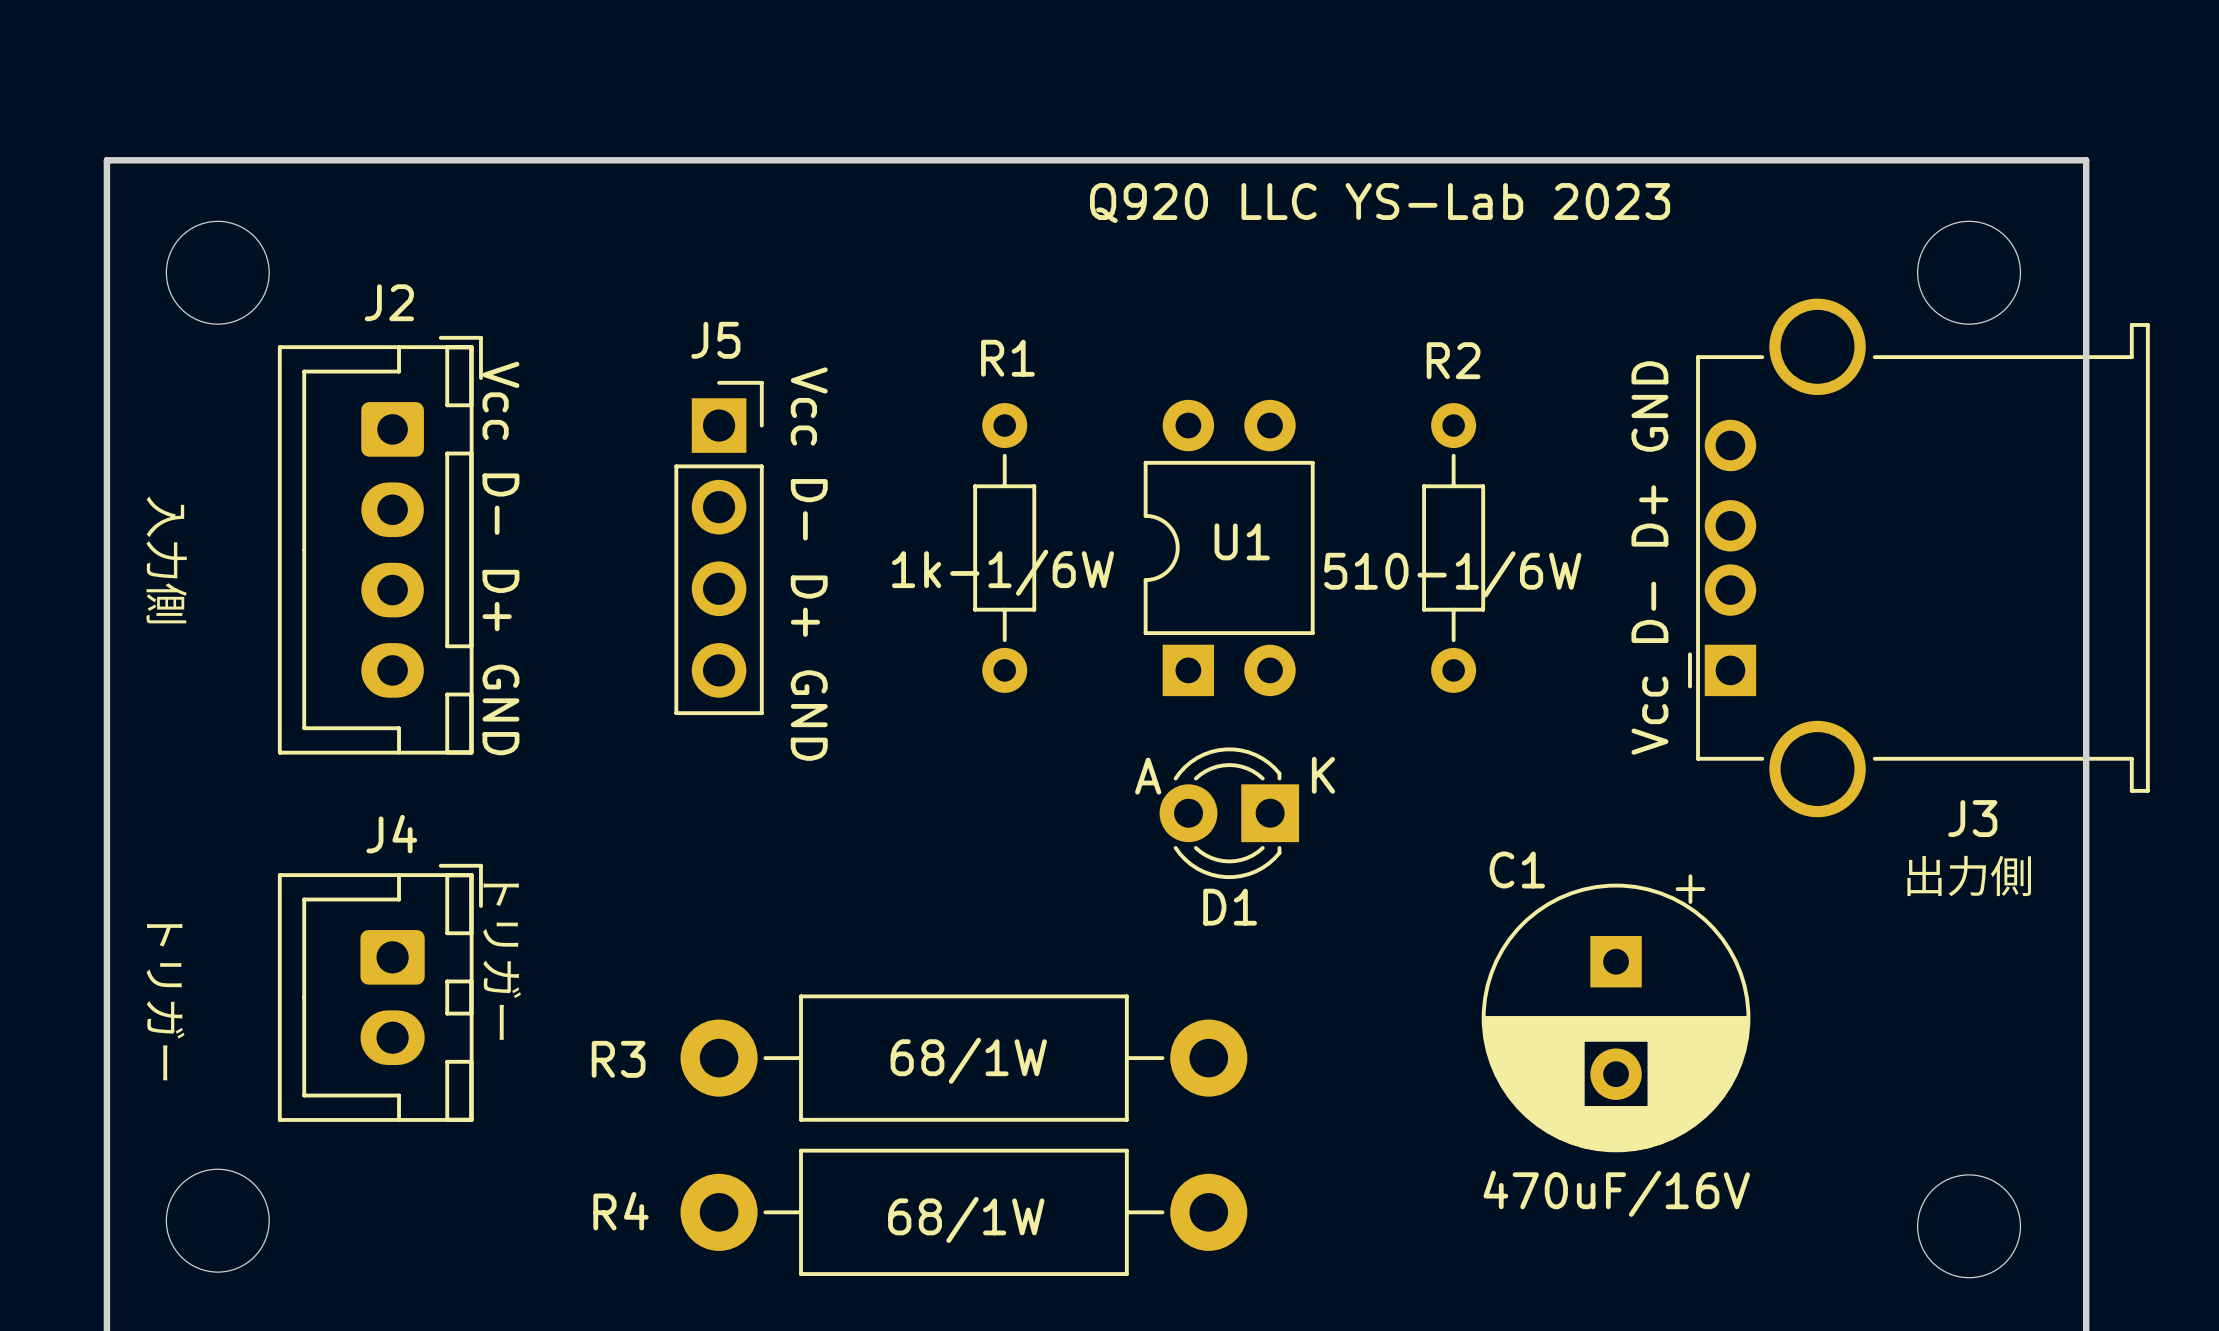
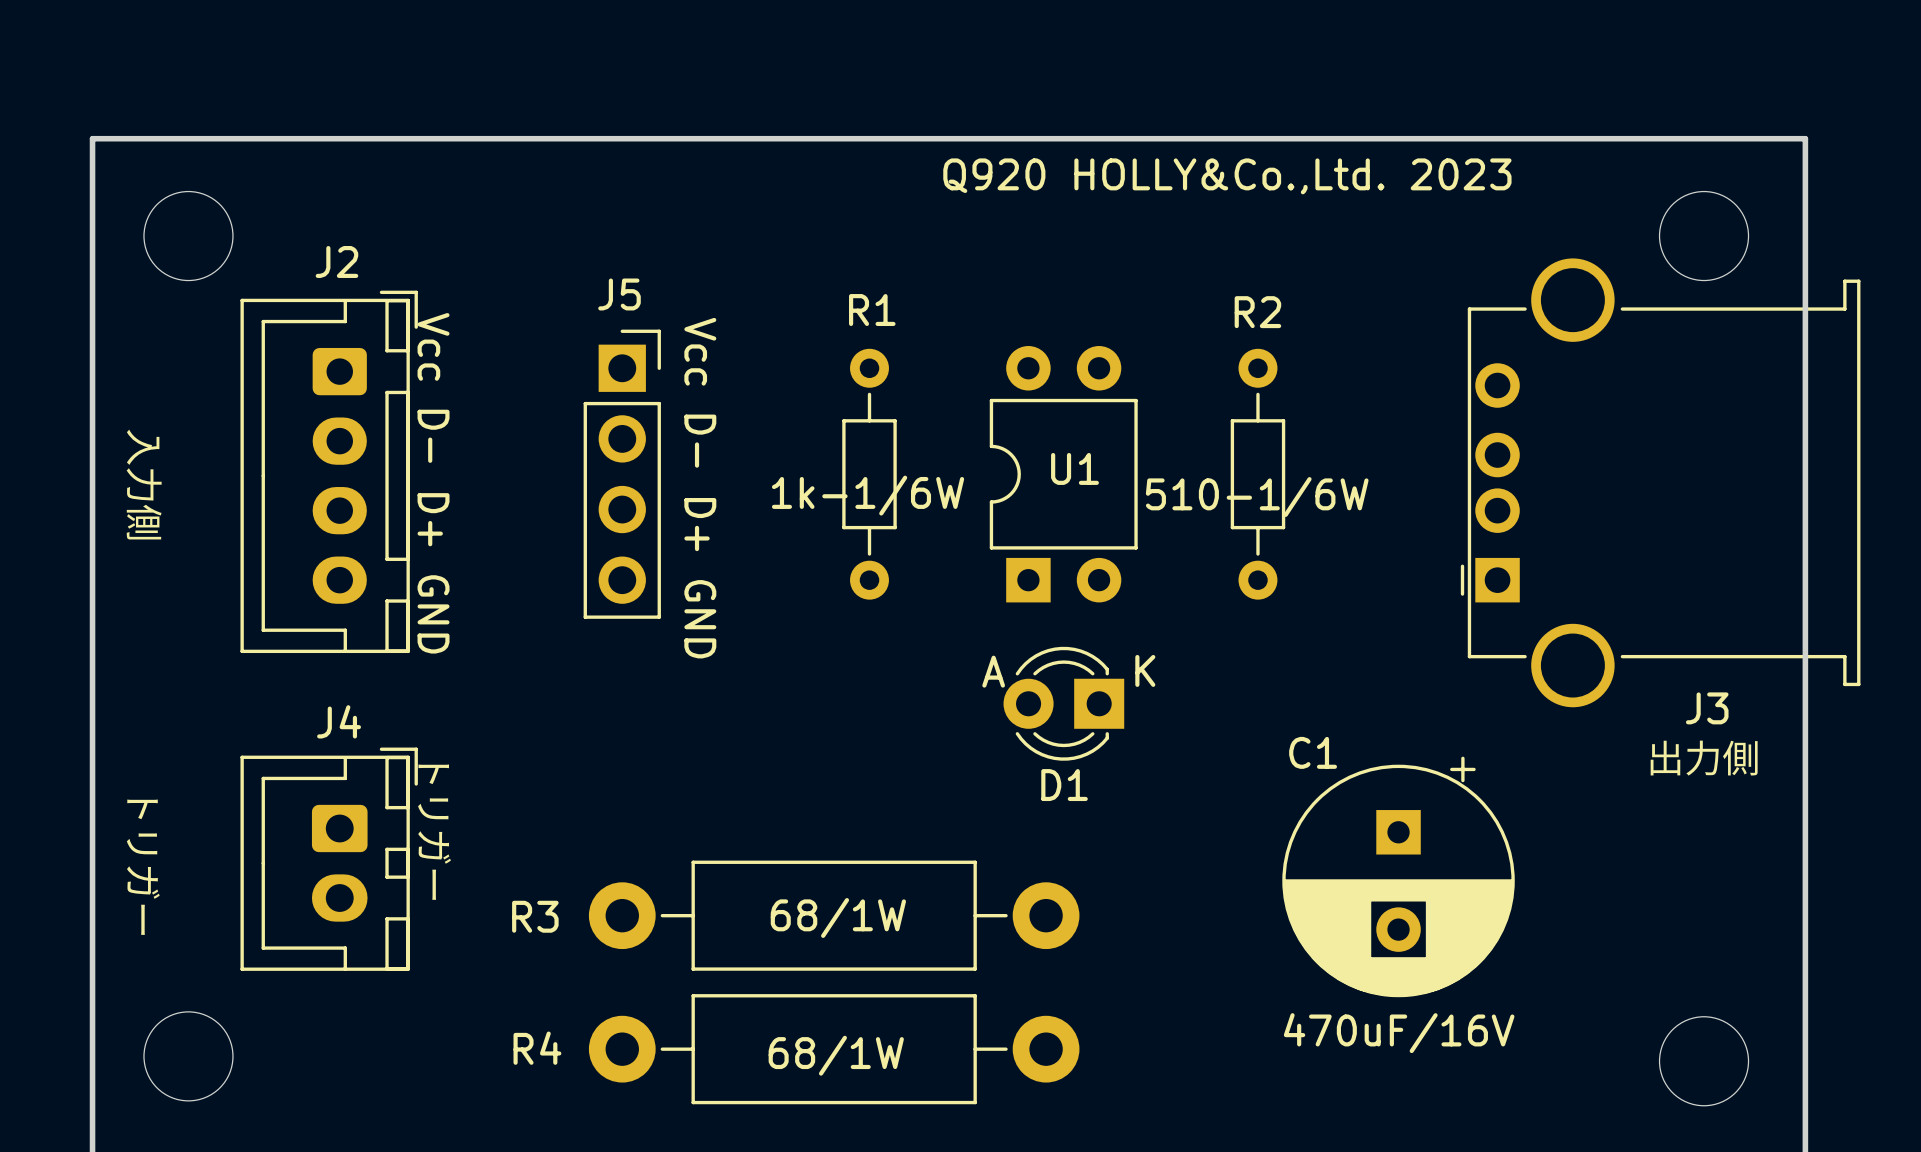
text: Q920 LLC YS-Lab 2023 (1380, 203) -> Q920 HOLLY&Co.,Ltd. 2023 (1227, 176)
text: Vcc D- D+ GND (1649, 557) -> none

